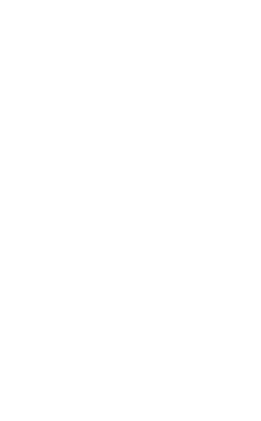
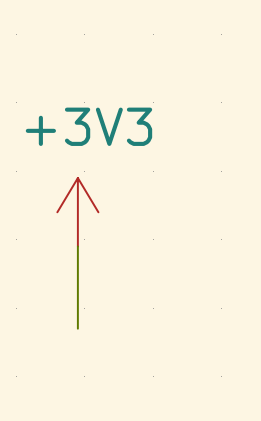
power symbol: none -> +3V3 (77, 212)
wire: none -> (77, 246) (77, 328)

